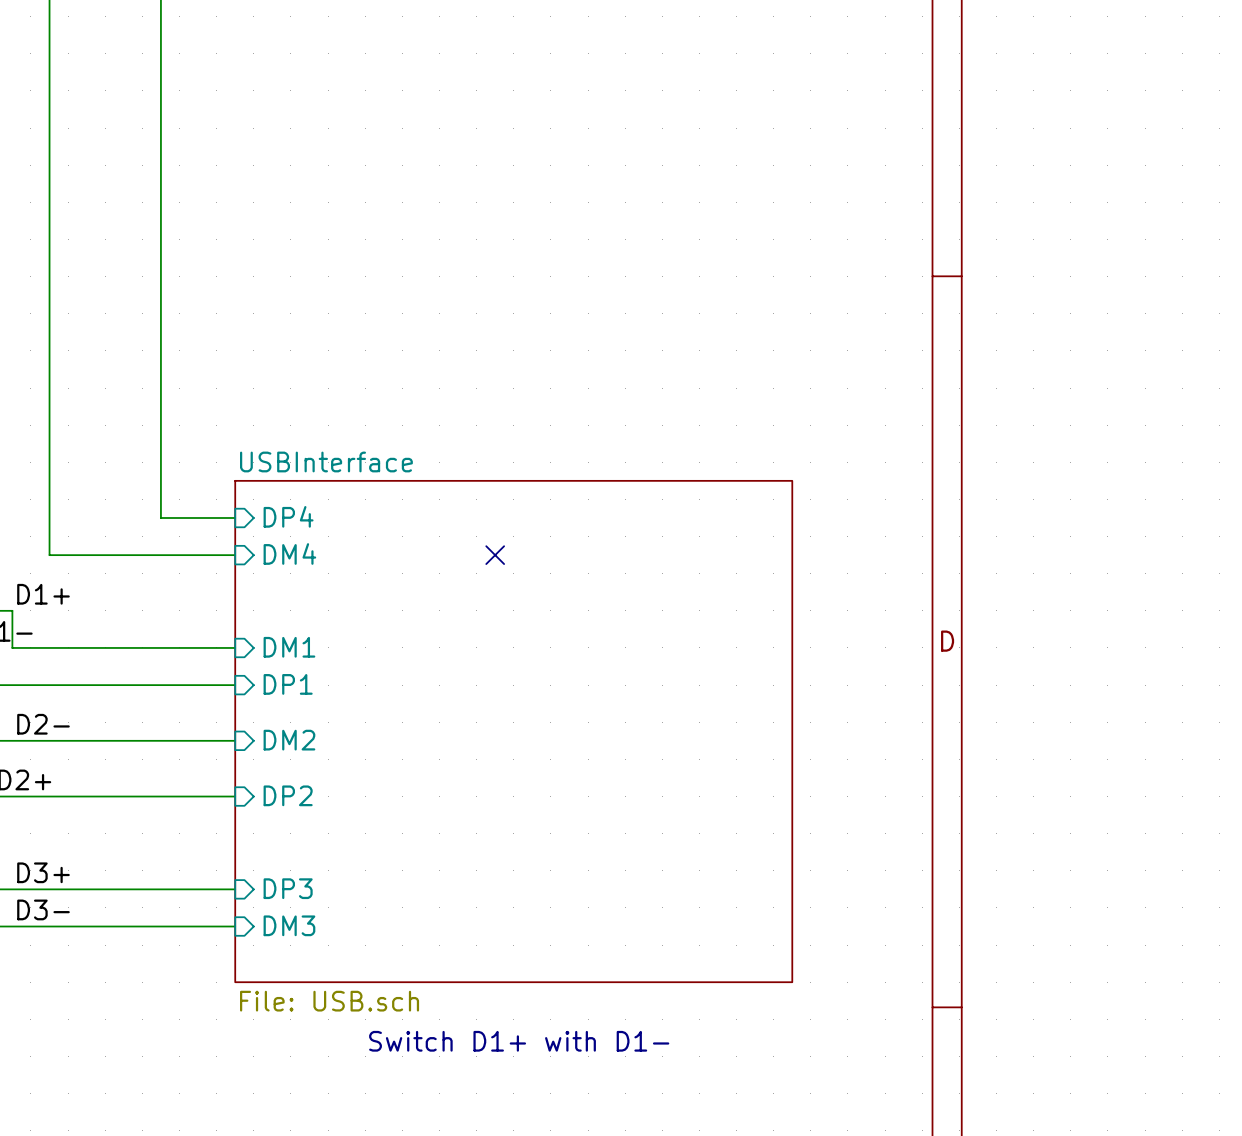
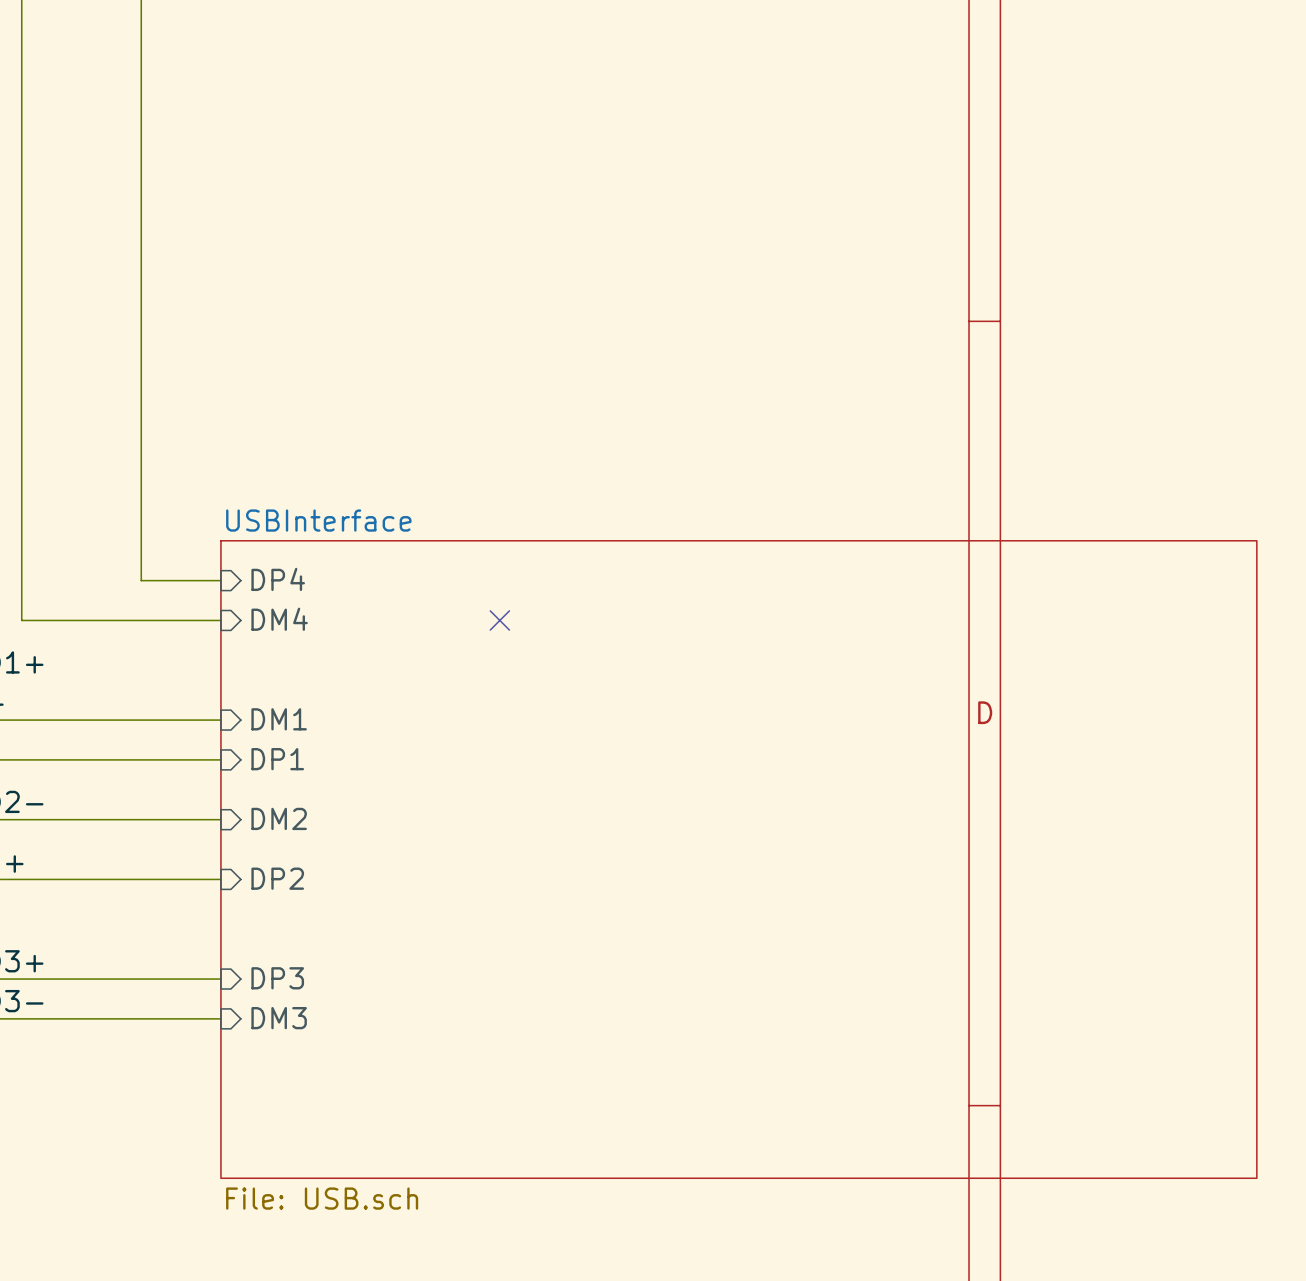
sheet USBInterface: File: USB.sch (513, 731) -> none
sheet USBInterface: none -> File: USB.sch (738, 859)
text: Switch D1+ with D1- (519, 1041) -> none

